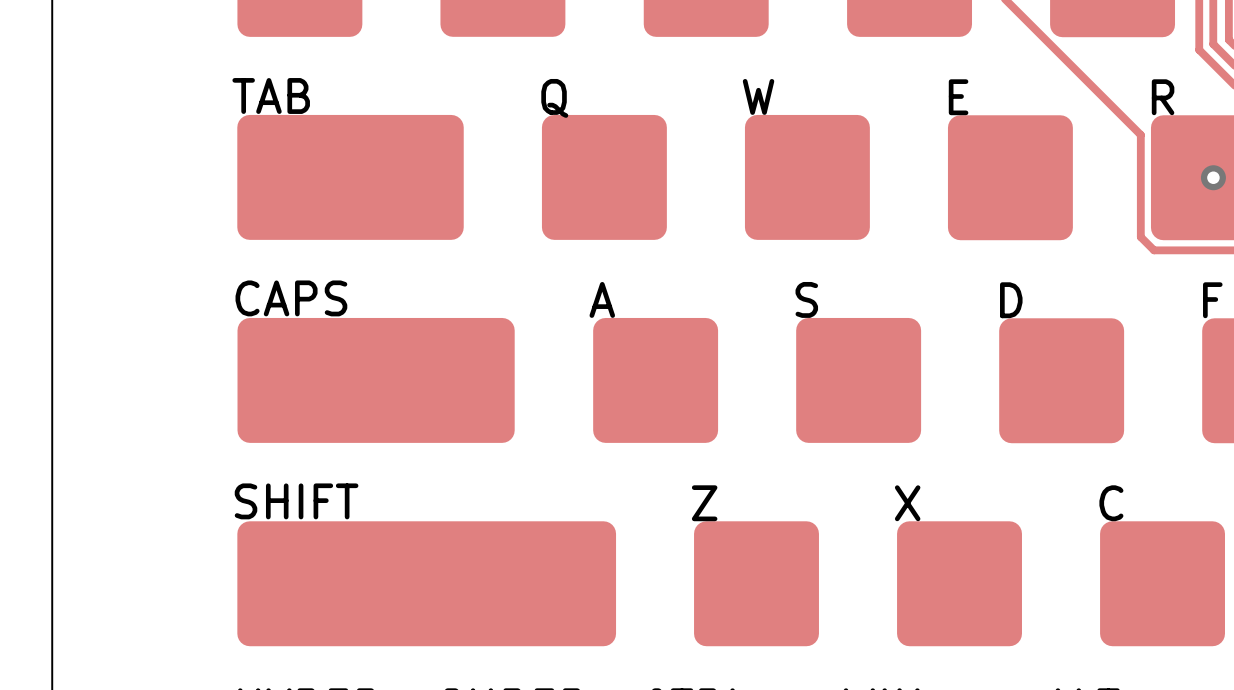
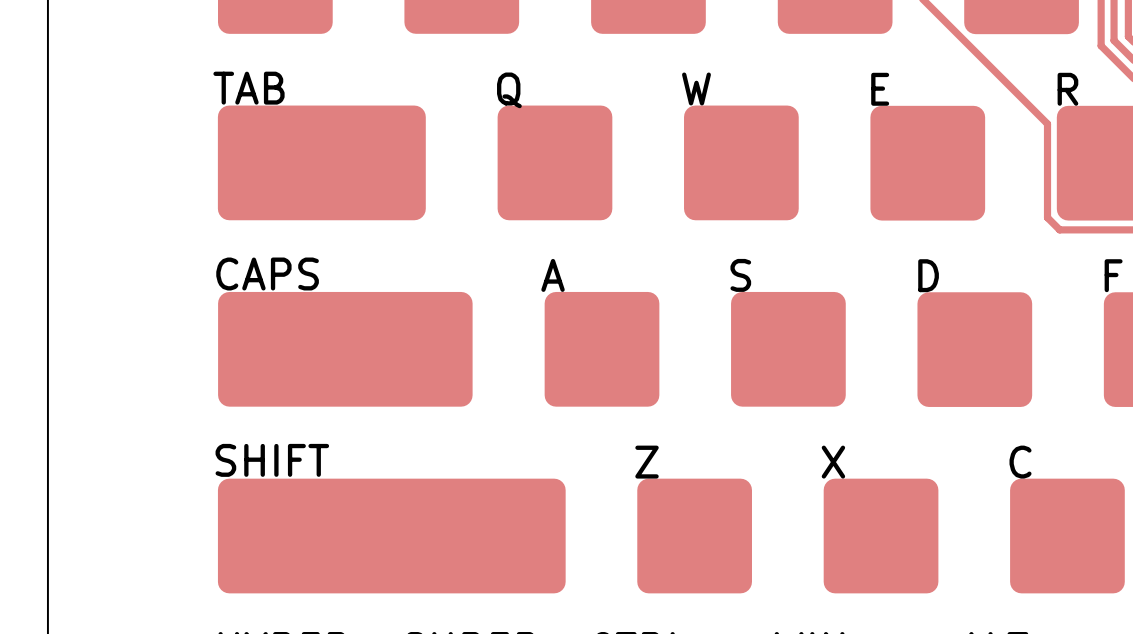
via: (1213, 177) -> none

